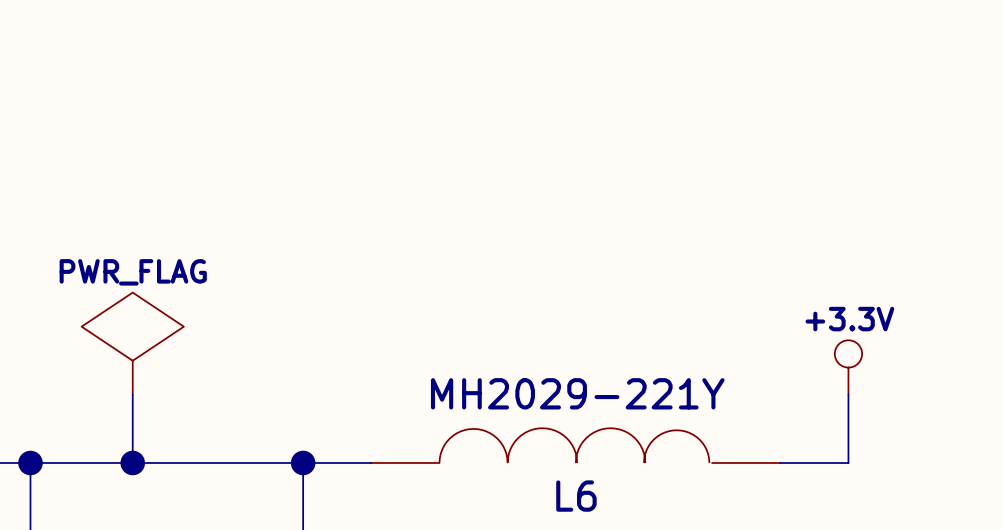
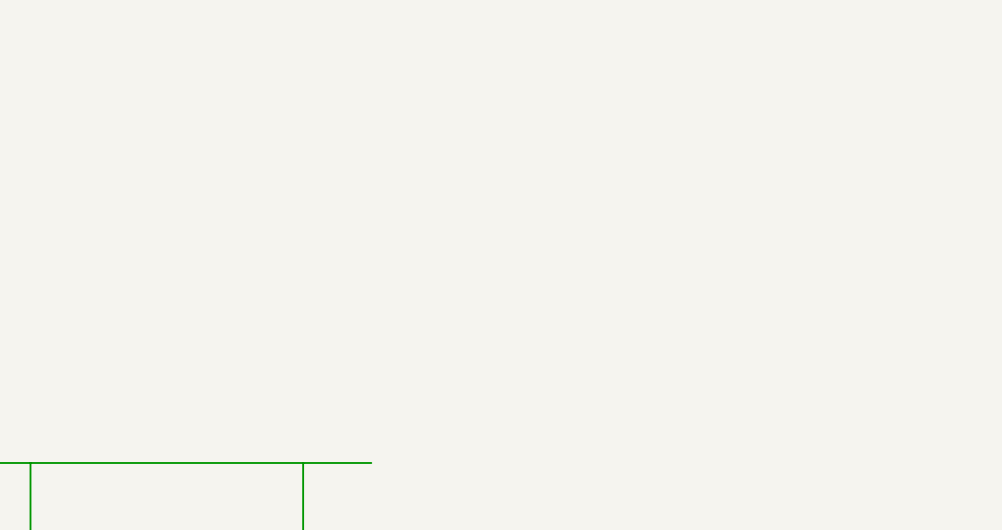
power symbol: PWR_FLAG (132, 343) -> none
power symbol: +3.3V (848, 367) -> none
wire: (132, 394) (132, 462) -> none
wire: (848, 394) (848, 462) (780, 462) -> none
L6: MH2029-221Y (575, 445) -> none
junction: (30, 462) -> none
junction: (132, 462) -> none
junction: (303, 462) -> none

